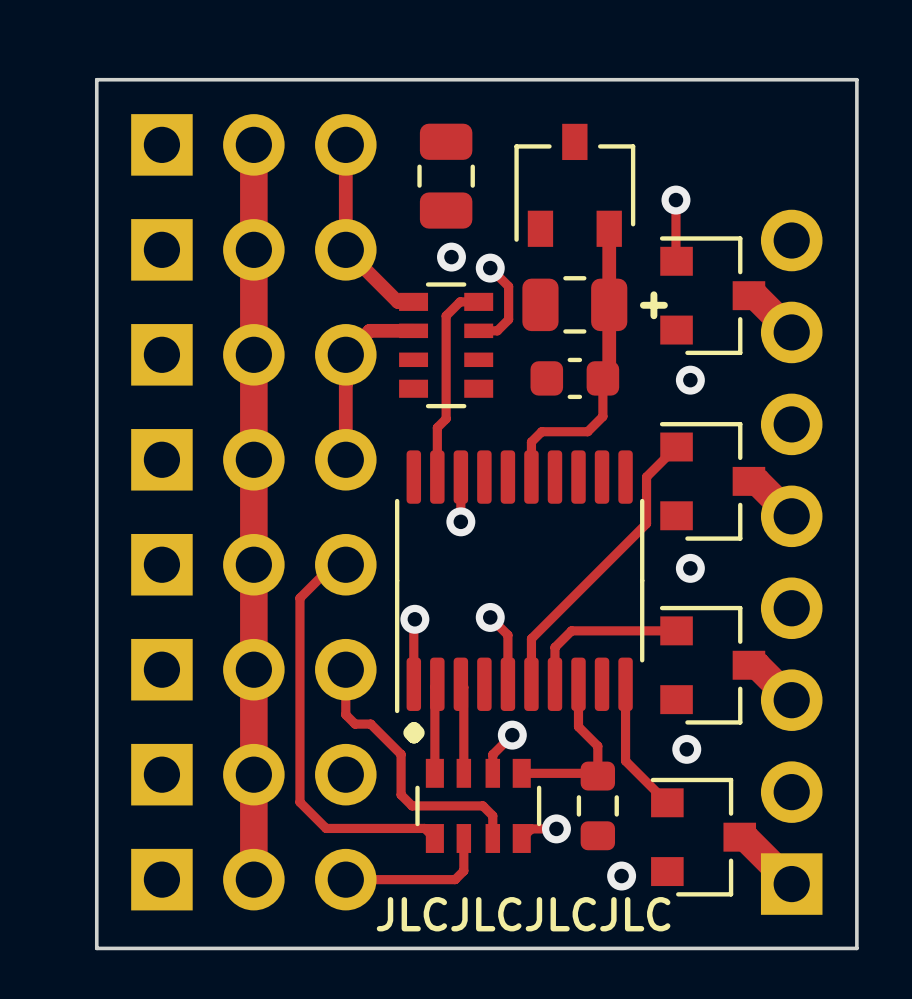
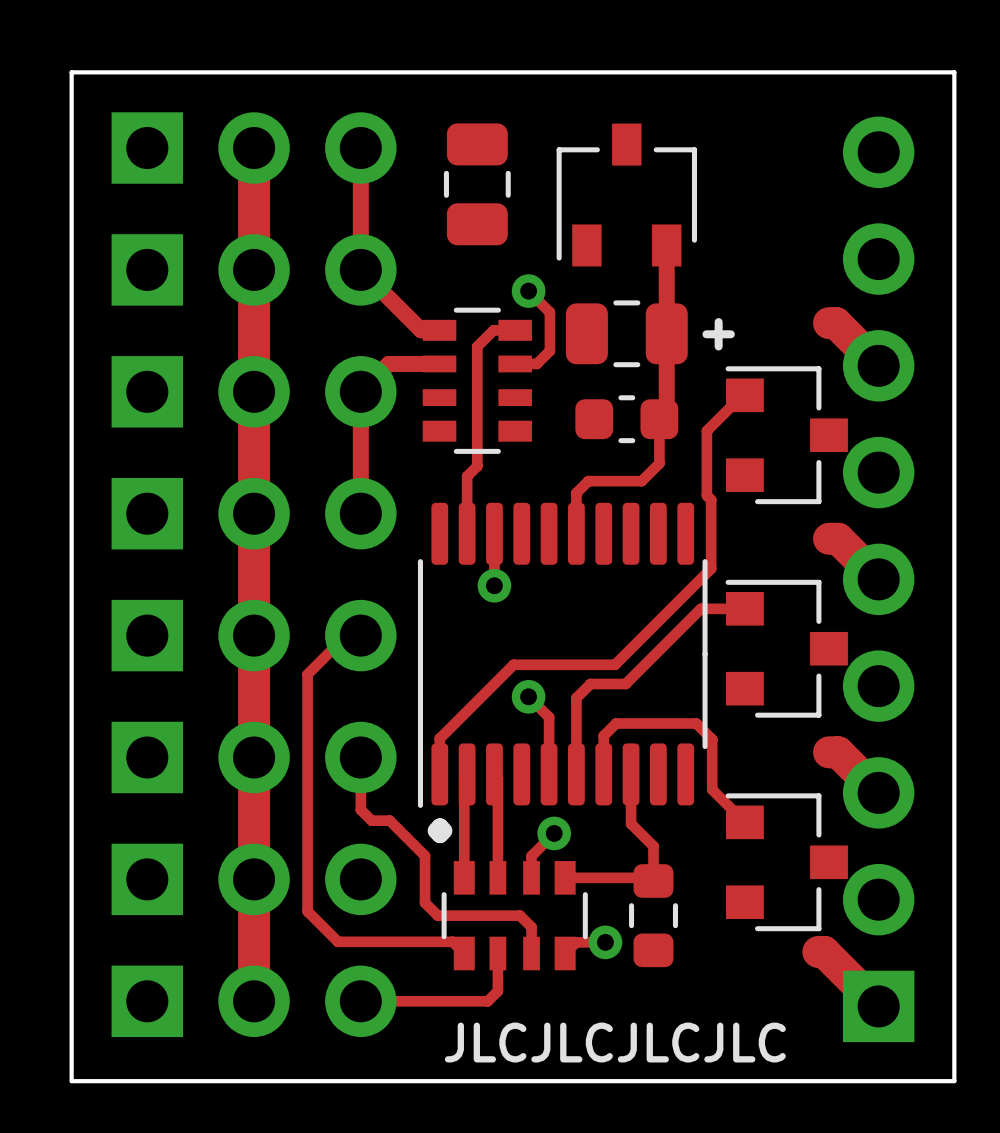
track: (675, 200) (676, 261) -> none
via: (675, 200) -> none
via: (451, 257) -> none
part: (712, 295) -> none
via: (690, 380) -> none
part: none -> (786, 435)
track: (676, 447) (646, 476) (646, 523) (531, 638) -> (744, 608) (700, 608) (625, 683) (590, 683) (576, 698) (576, 721)
part: (712, 481) -> none
part: none -> (878, 579)
part: (791, 562) -> none
via: (690, 568) -> none
part: none -> (786, 648)
track: (414, 619) (413, 653) -> (744, 395) (742, 395) (706, 430) (706, 495) (711, 499) (711, 568) (615, 664) (513, 664) (439, 738)
via: (414, 619) -> none
track: (676, 630) (571, 630) (554, 647) (554, 651) -> (744, 822) (712, 789) (712, 739) (696, 723) (616, 723) (603, 735)
part: (712, 665) -> none
track: (625, 684) (625, 760) (667, 802) -> none
via: (686, 749) -> none
part: none -> (786, 862)
part: (703, 837) -> none
via: (621, 876) -> none
text position: JLCJLCJLCJLC (523, 914) -> JLCJLCJLCJLC (615, 1042)

